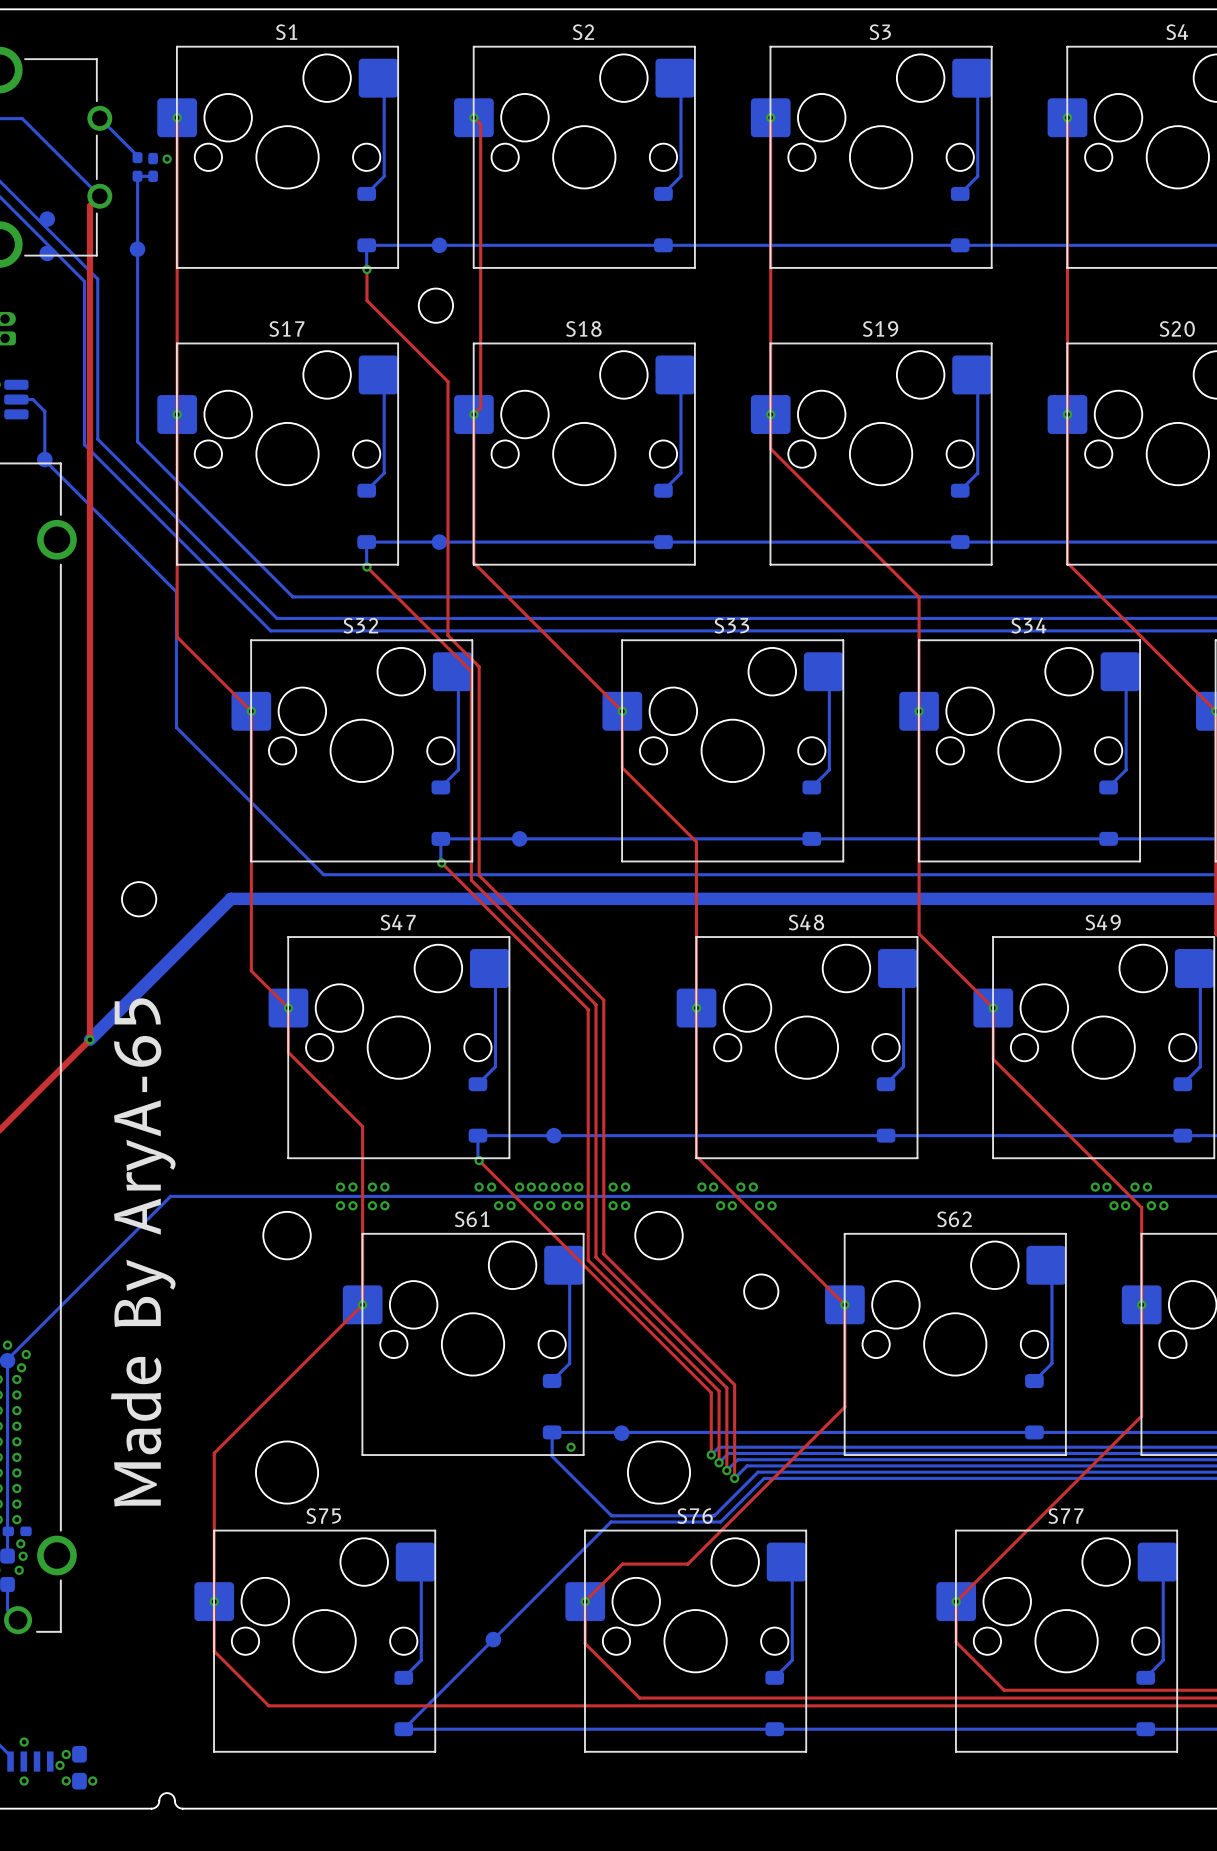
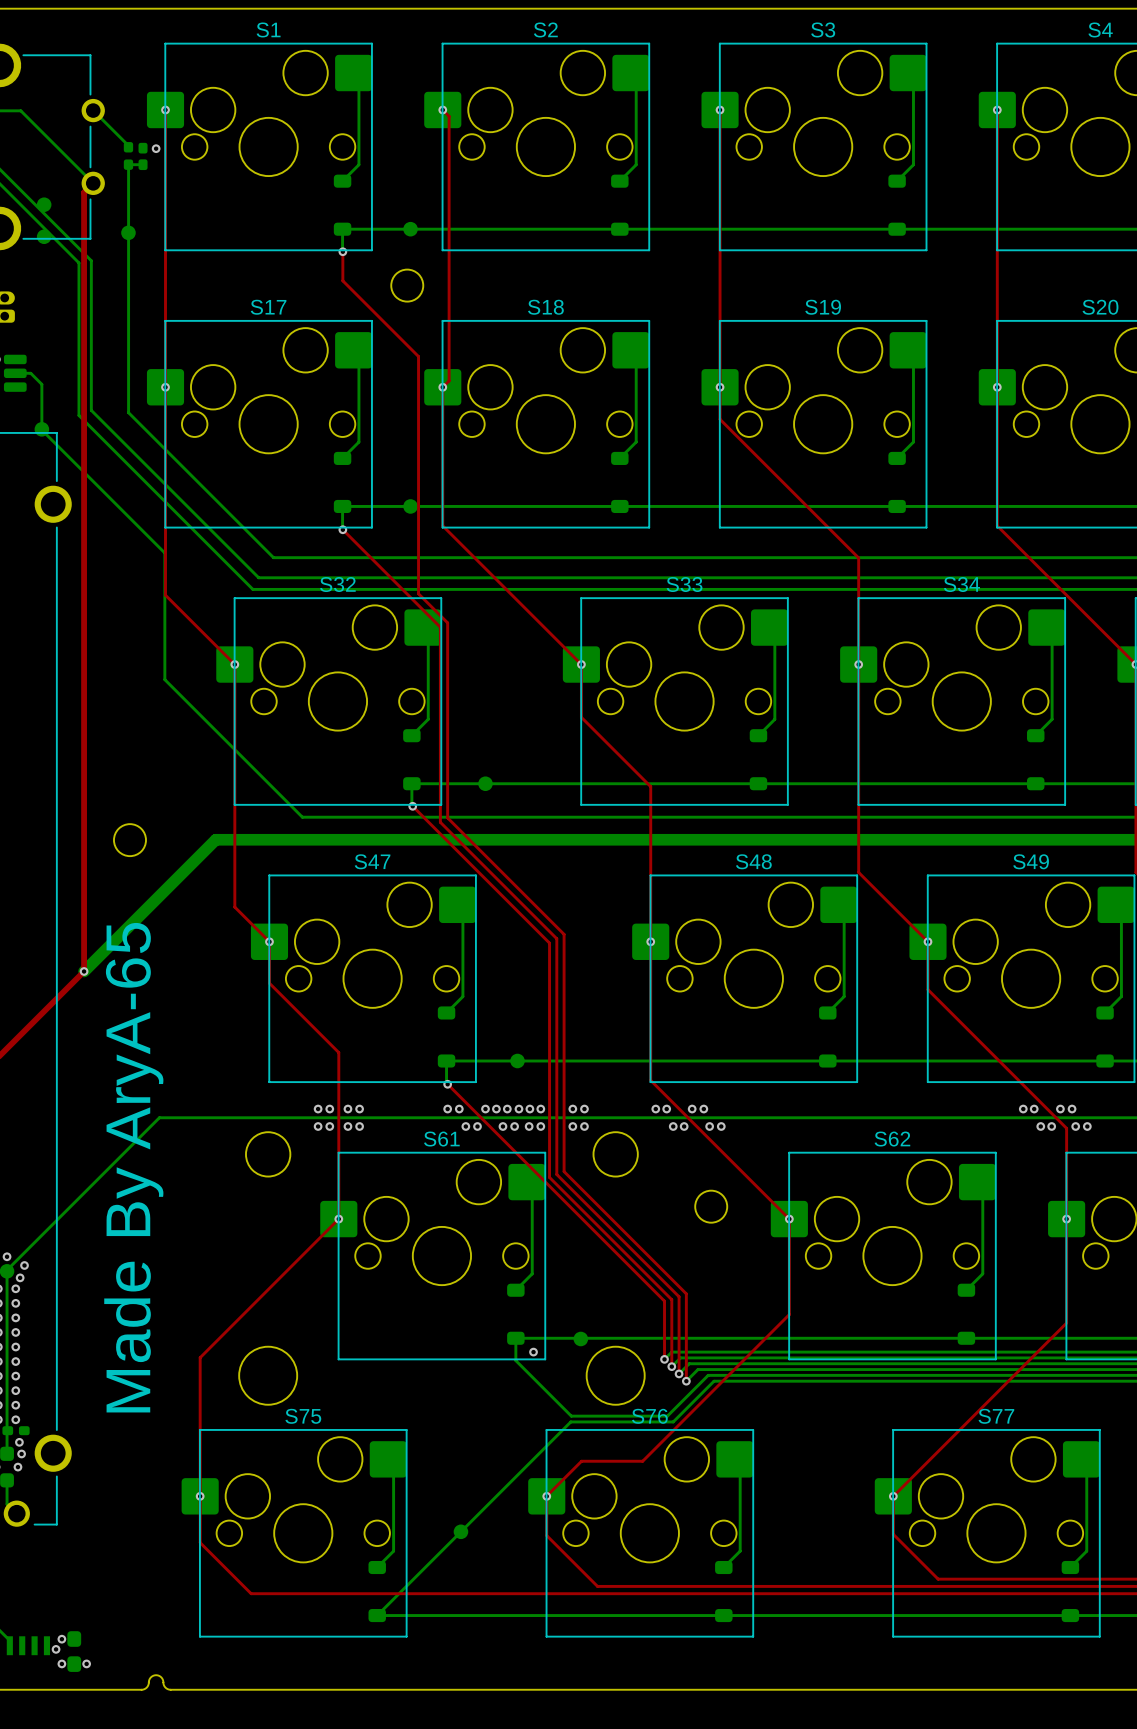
via: (24, 1742) -> none
via: (24, 1781) -> none

